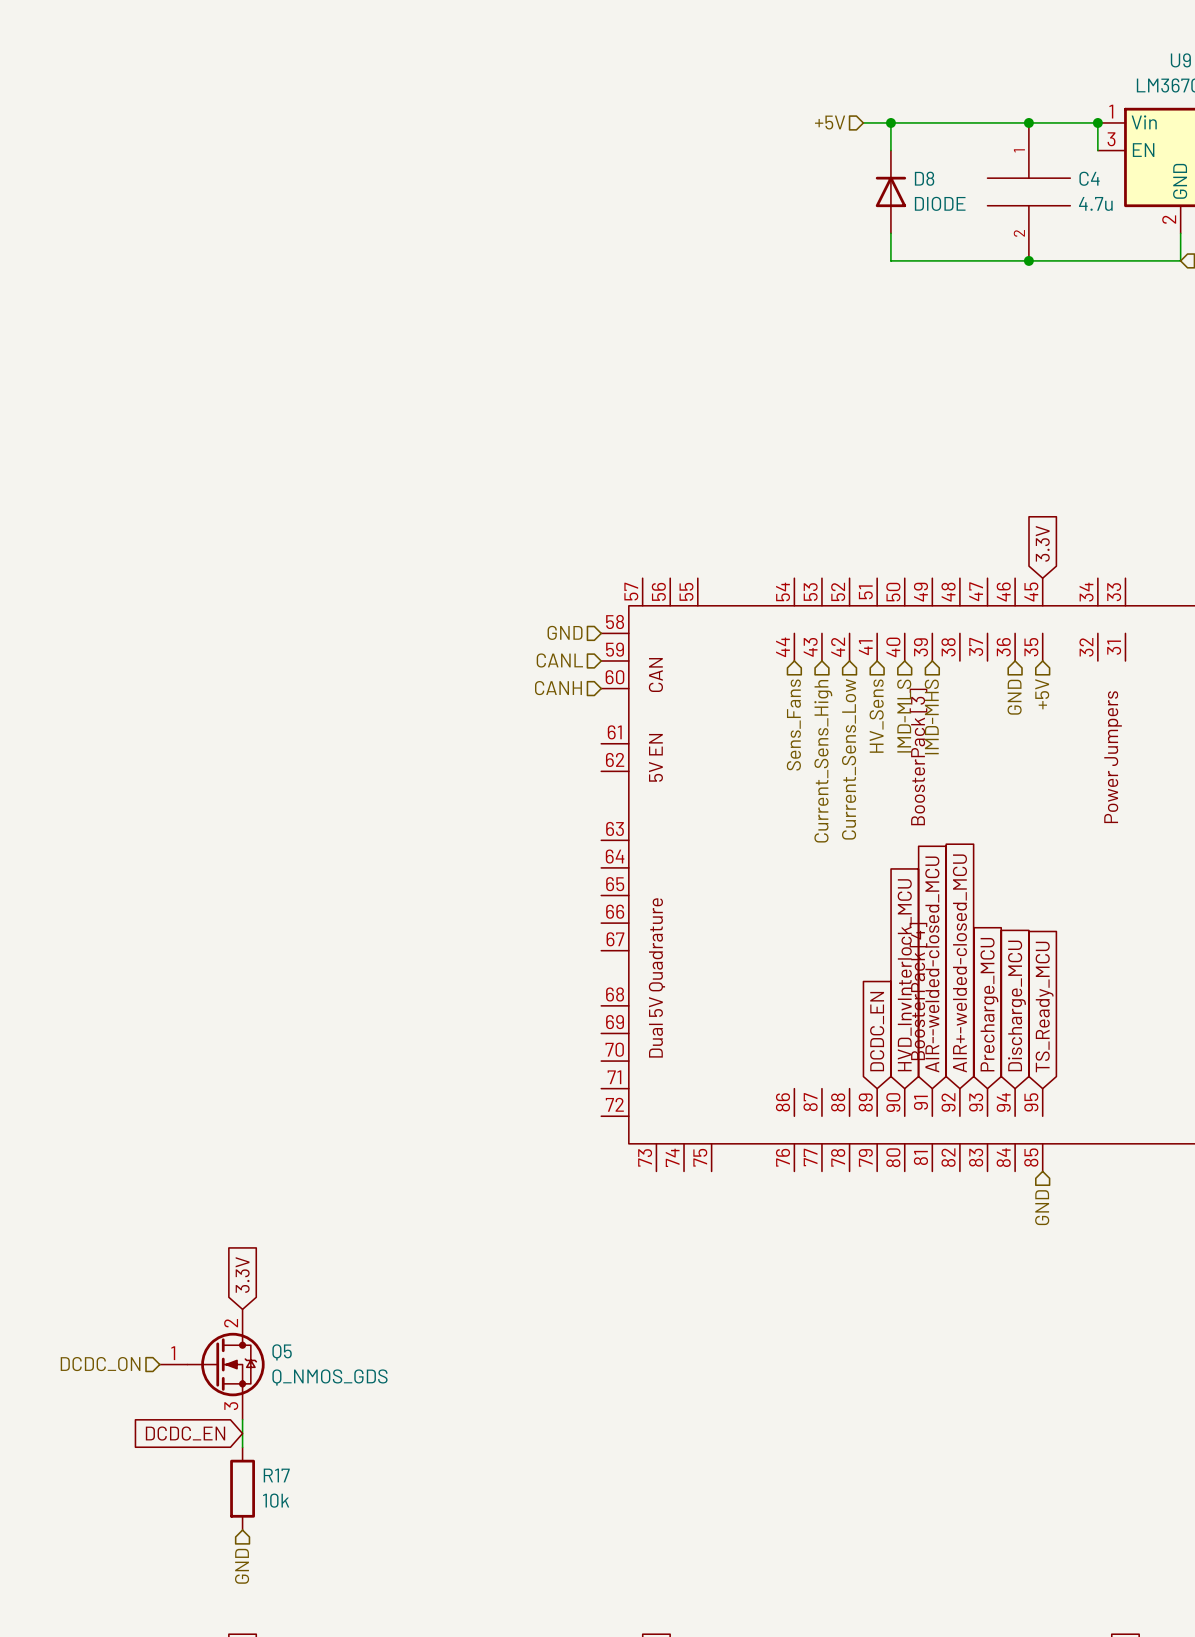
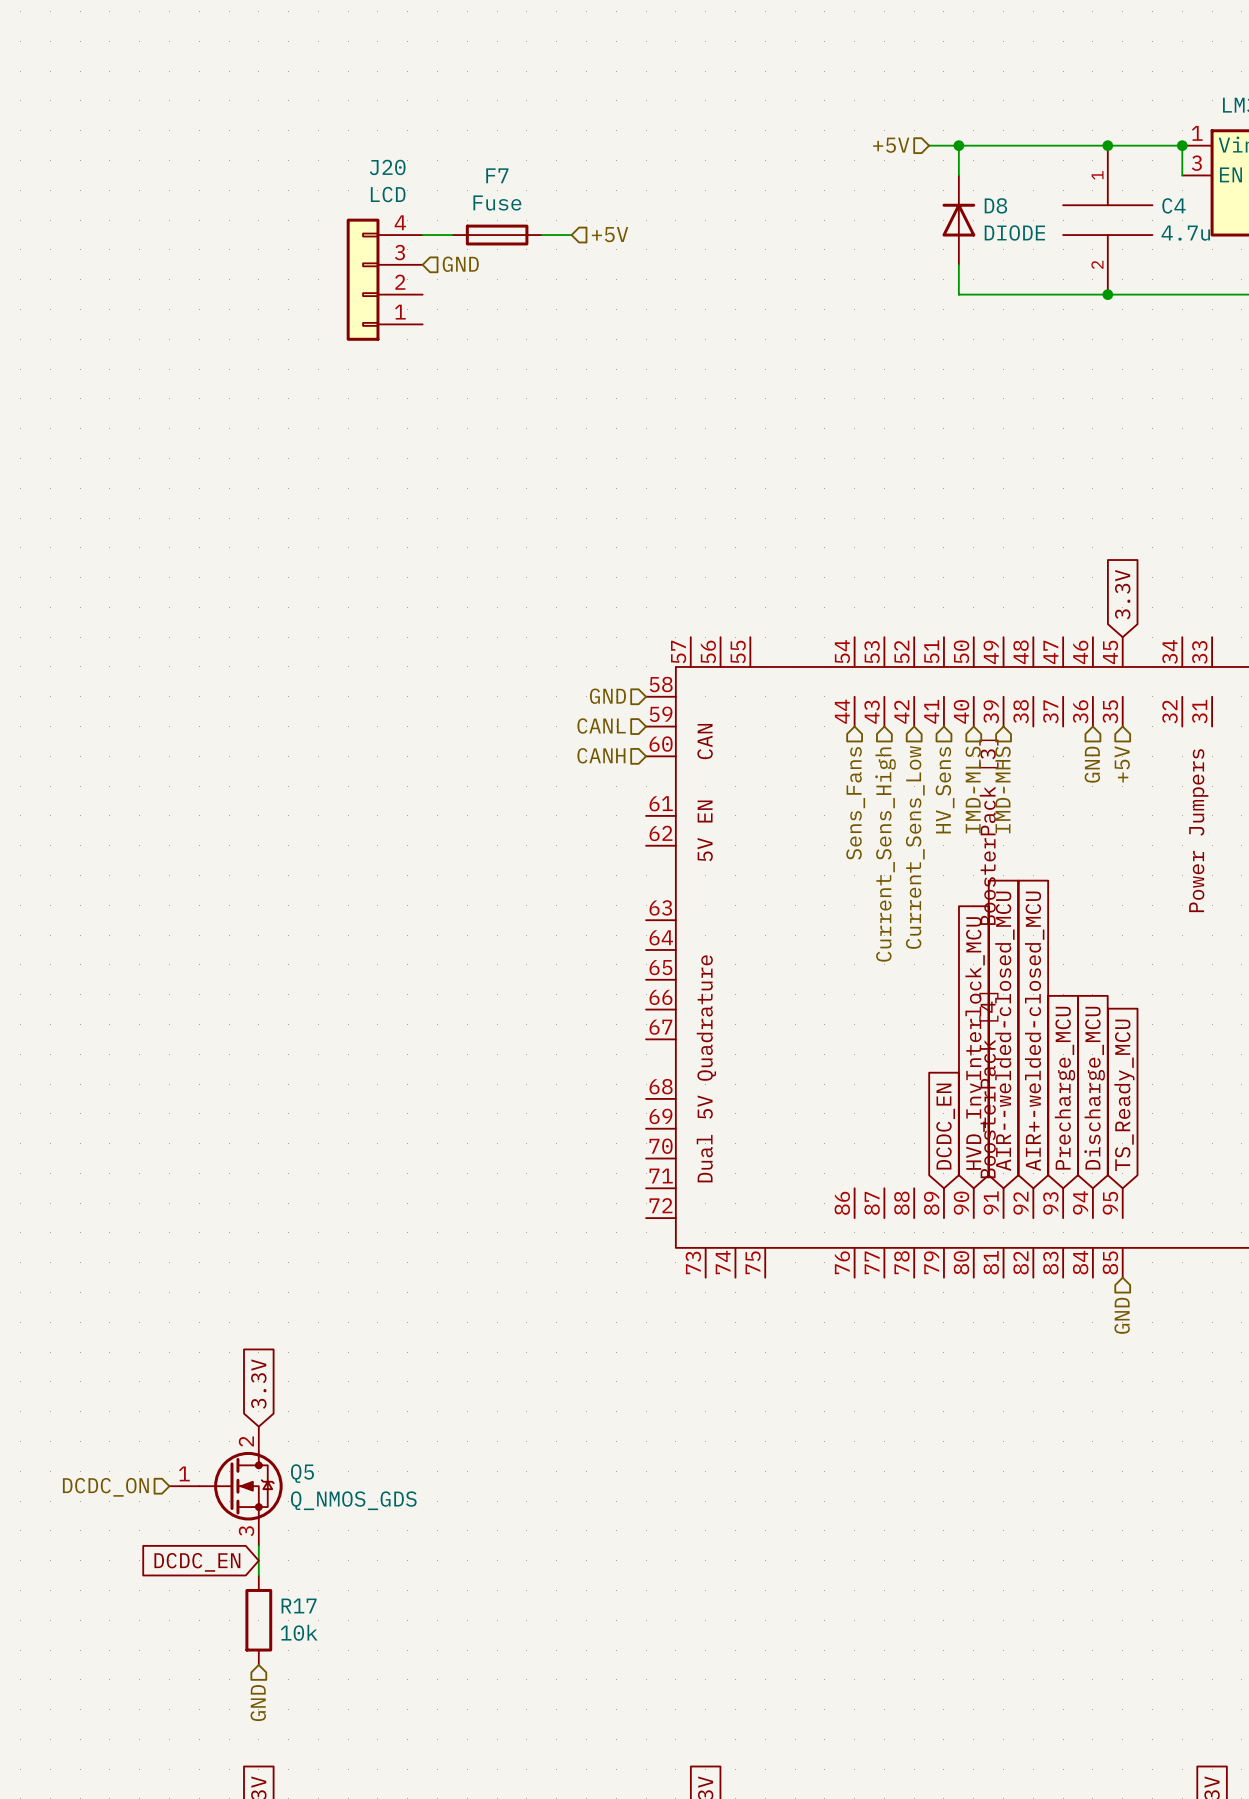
wire: none -> (422, 235) (452, 235)
F7: none -> Fuse (497, 235)
wire: none -> (541, 235) (571, 235)
hierarchical label: none -> +5V (610, 234)
hierarchical label: none -> GND (460, 264)
J20: none -> LCD (384, 279)

